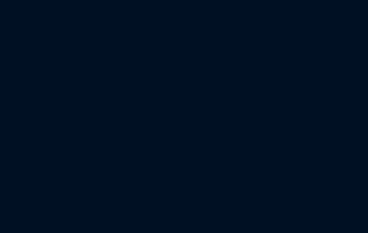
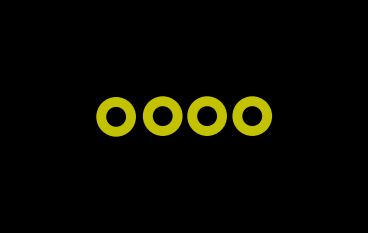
part: none -> (184, 116)

